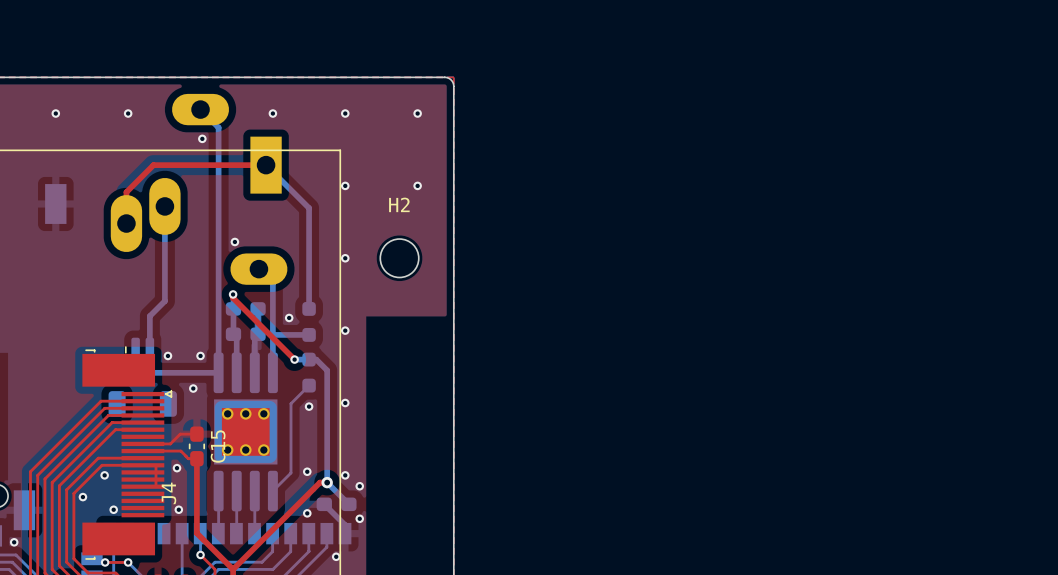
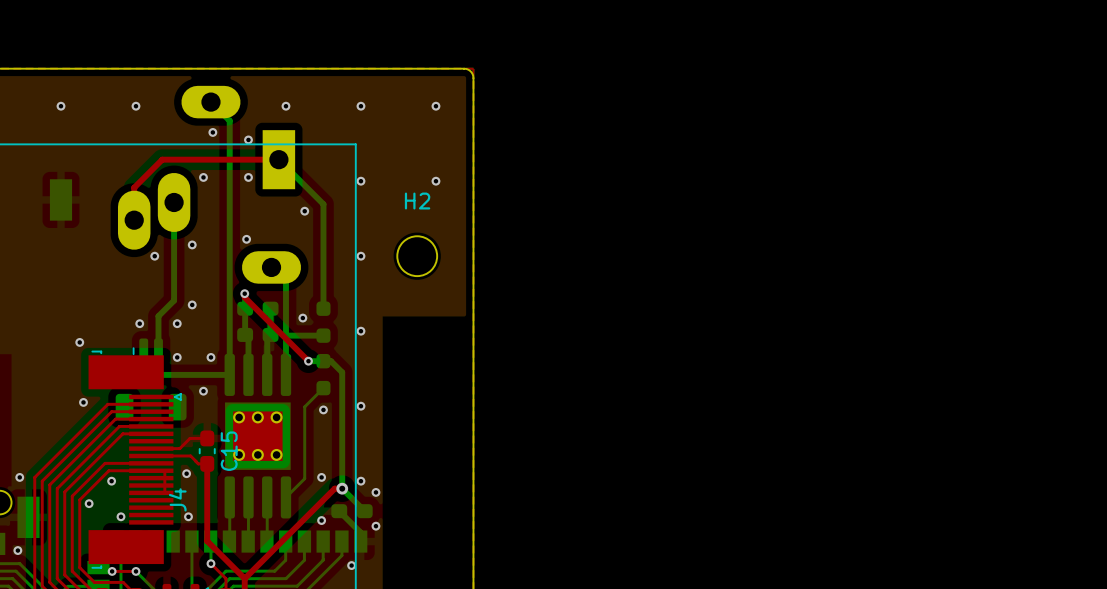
via: none -> (248, 139)
via: none -> (203, 177)
via: none -> (248, 177)
via: none -> (304, 211)
via: none -> (192, 244)
via: none -> (154, 256)
via: none -> (192, 304)
via: none -> (139, 323)
via: none -> (177, 323)
via: none -> (79, 342)
via: none -> (83, 402)
via: none -> (19, 477)

